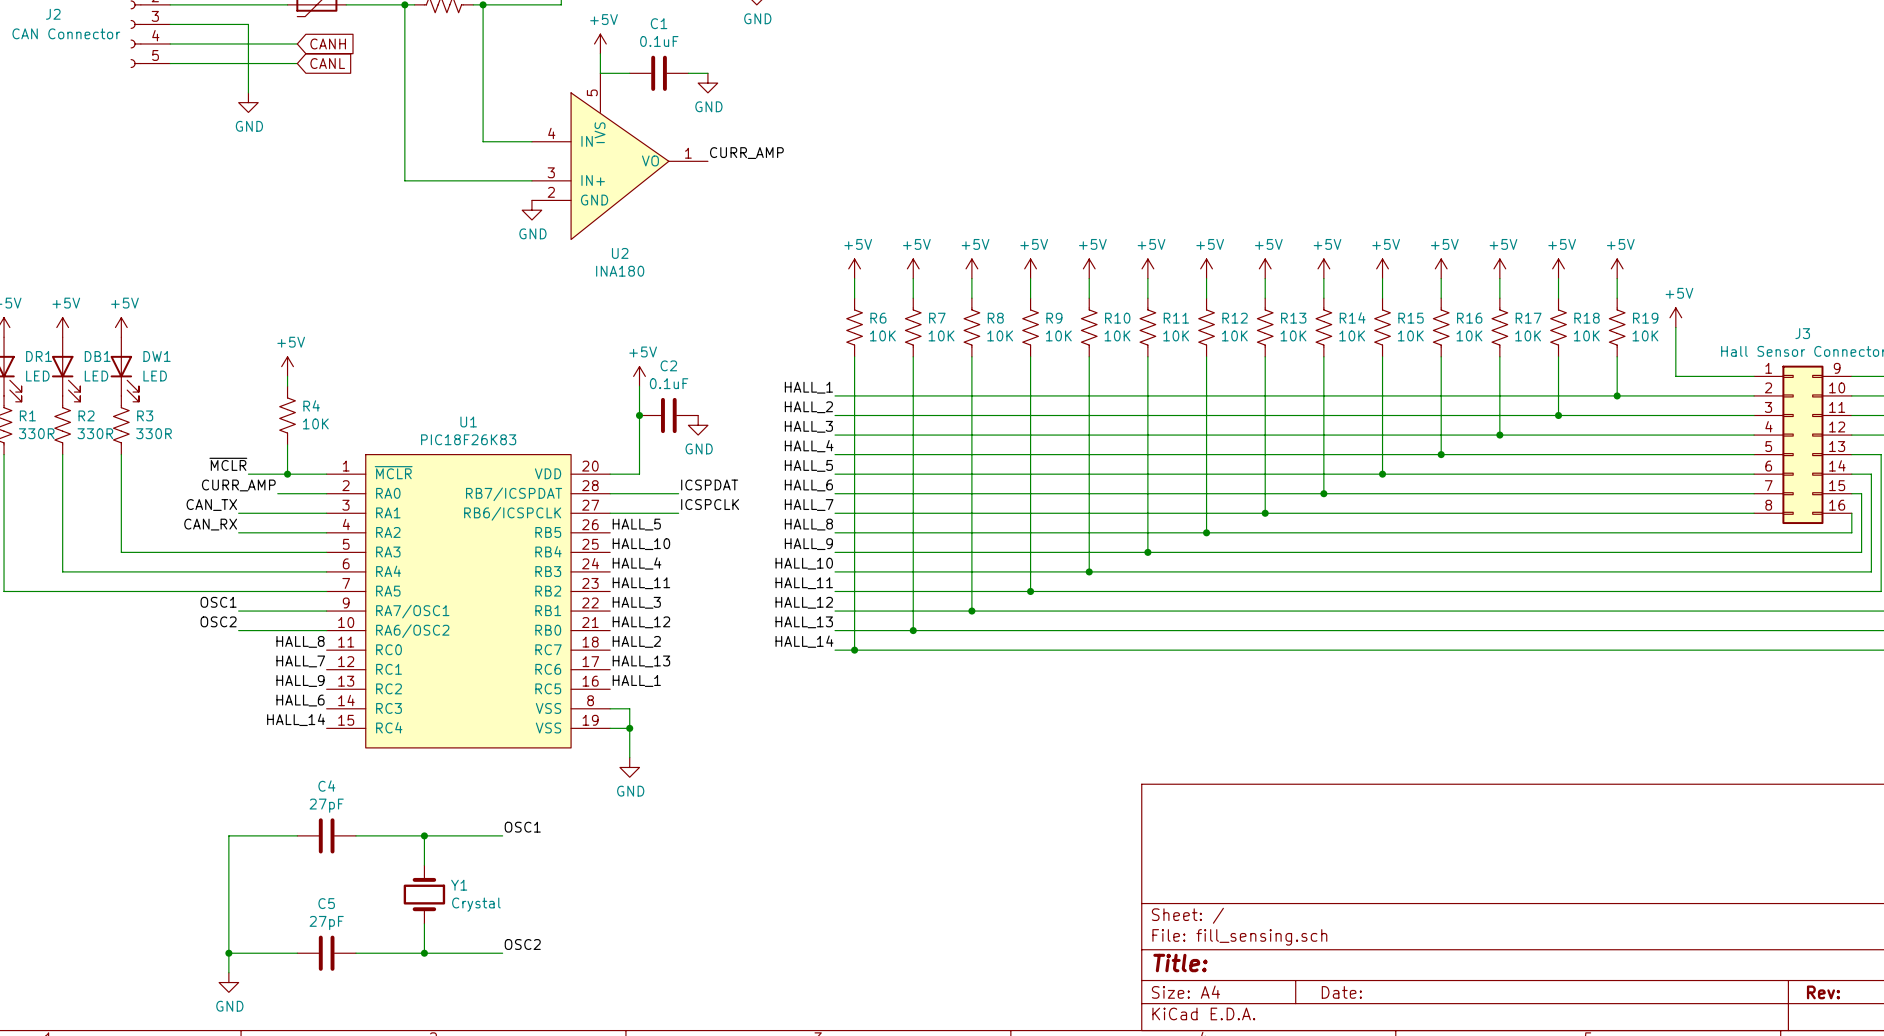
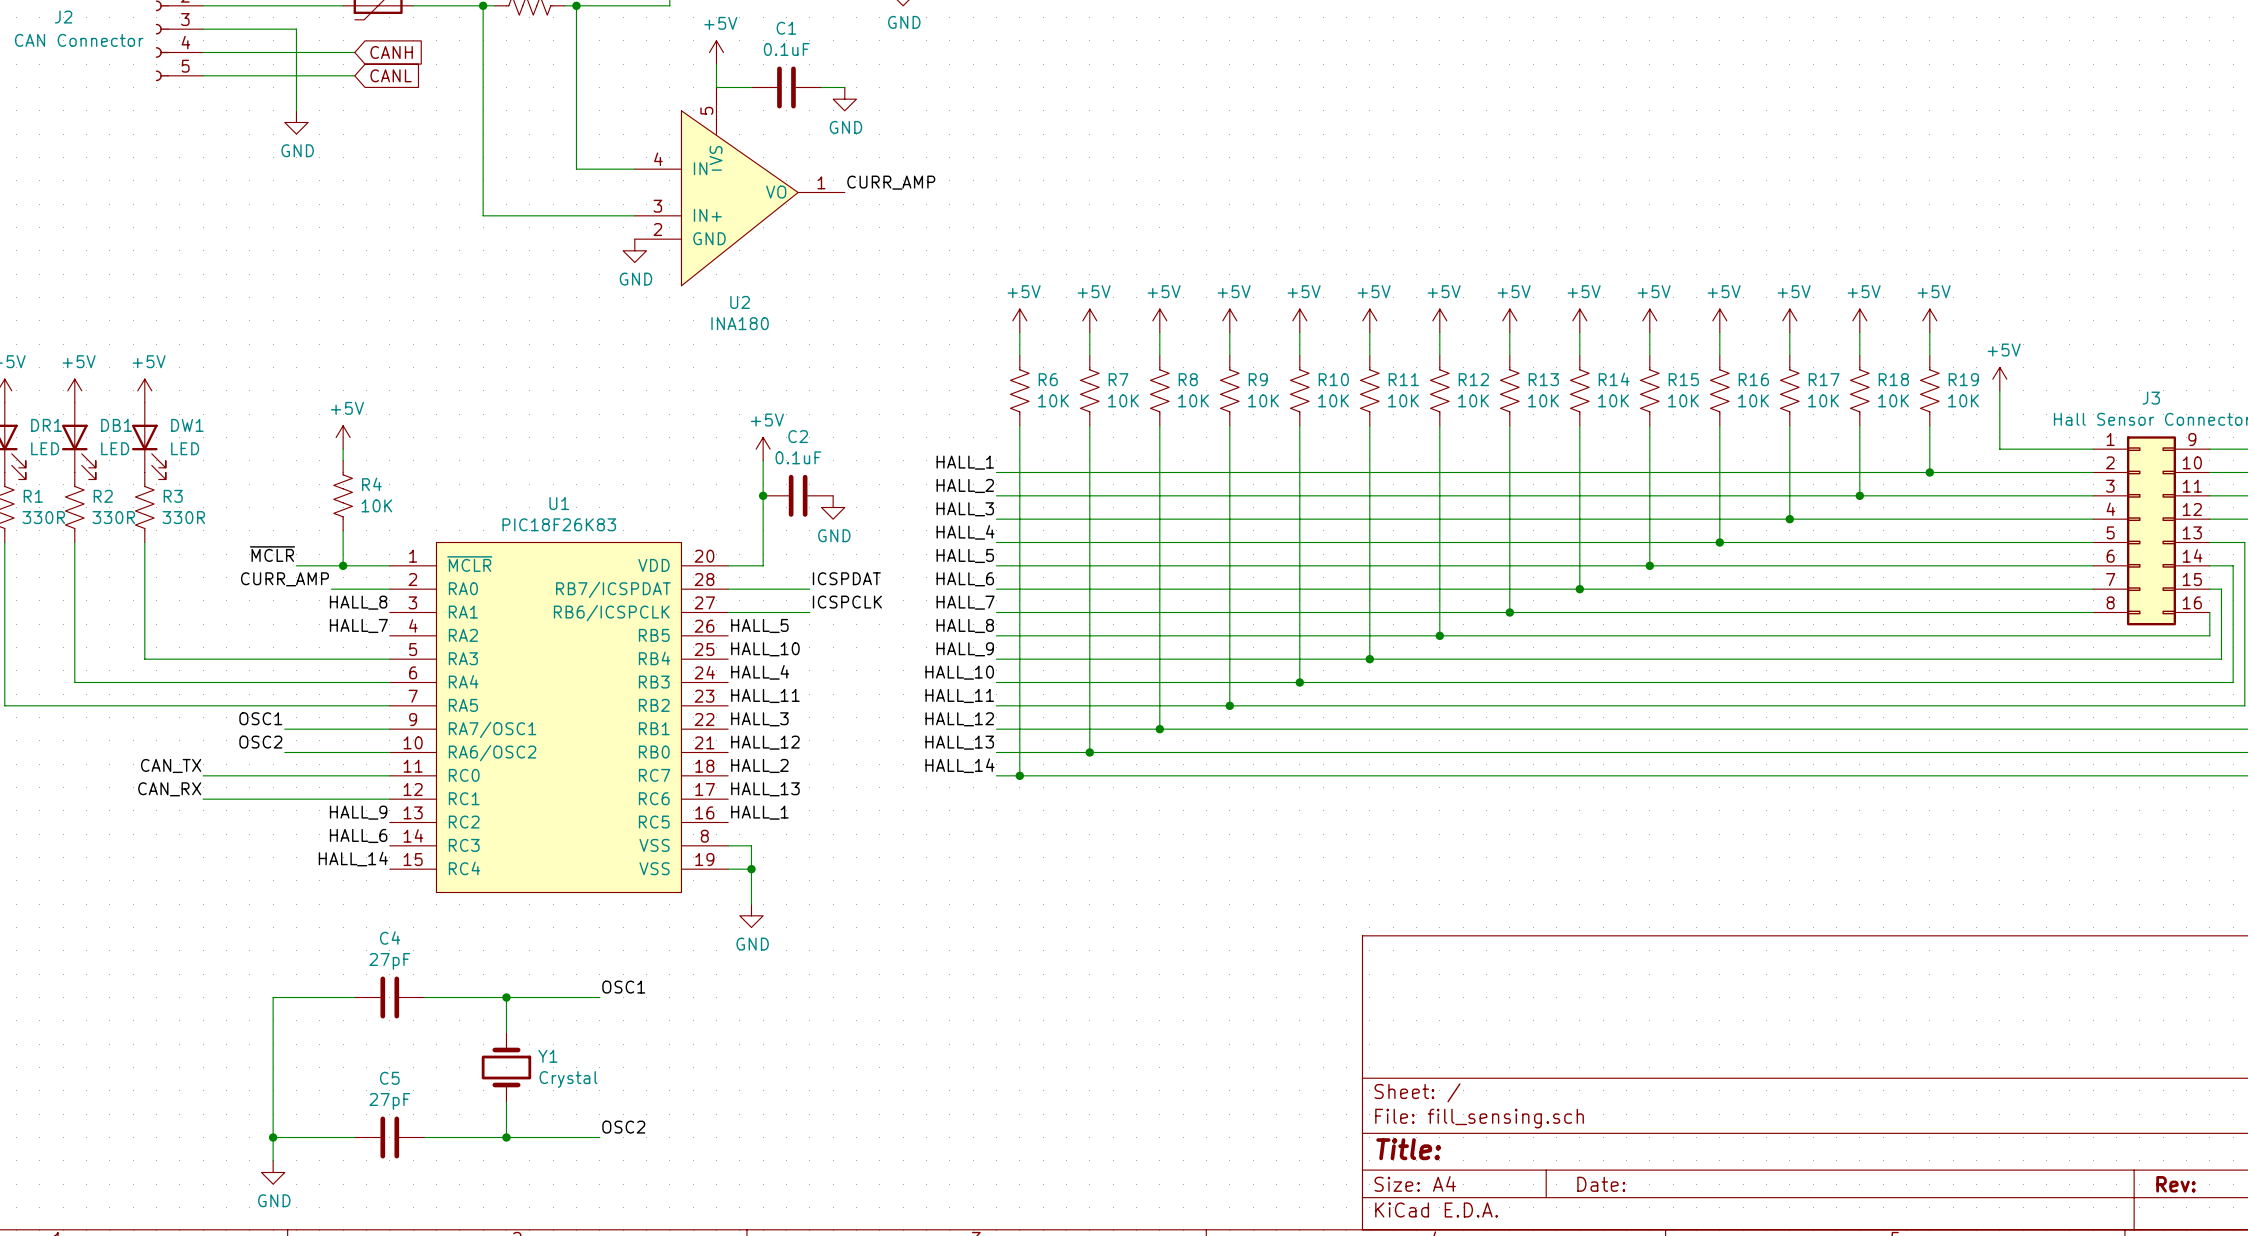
label position: CAN_TX (211, 505) -> CAN_TX (171, 765)
wire: (238, 513) (326, 513) -> none
label position: CAN_RX (210, 524) -> CAN_RX (169, 789)
wire: (238, 532) (326, 532) -> none
label position: HALL_8 (300, 641) -> HALL_8 (358, 602)
wire: none -> (203, 775) (389, 775)
label position: HALL_7 (300, 661) -> HALL_7 (358, 625)
wire: none -> (203, 799) (389, 799)

